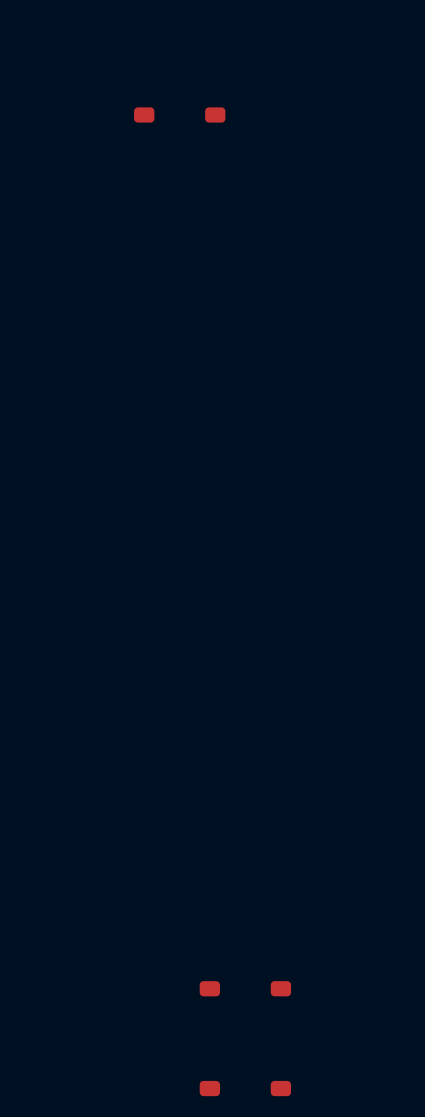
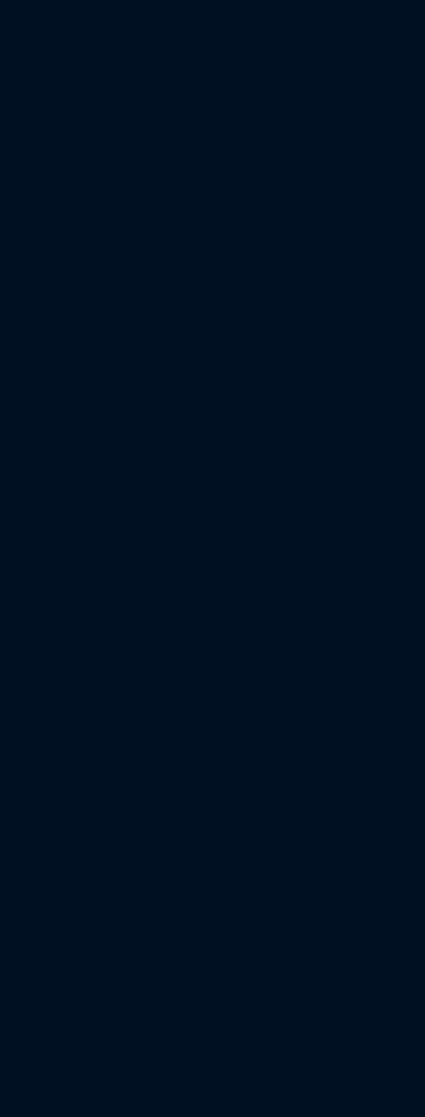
part: (179, 114) -> none
part: (245, 988) -> none
part: (245, 1088) -> none

